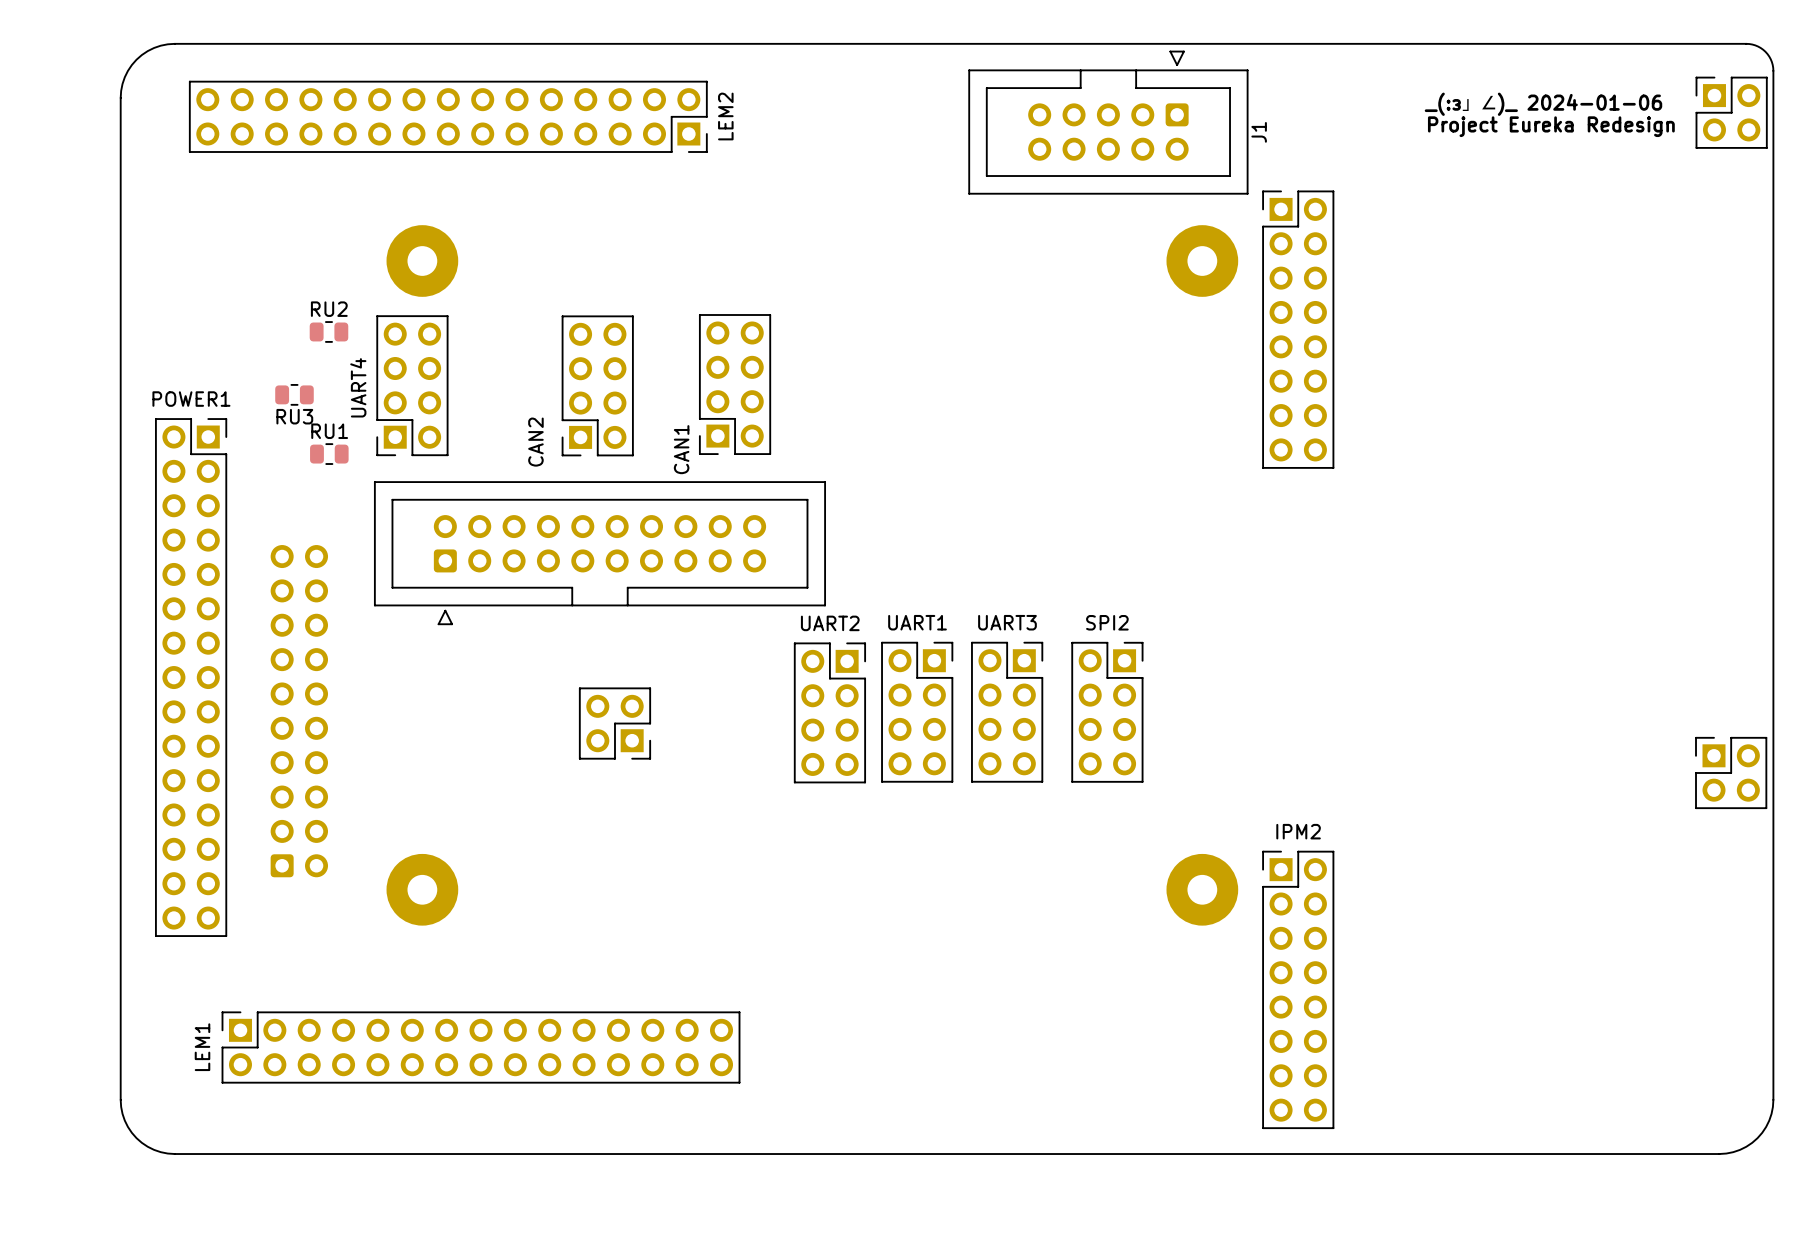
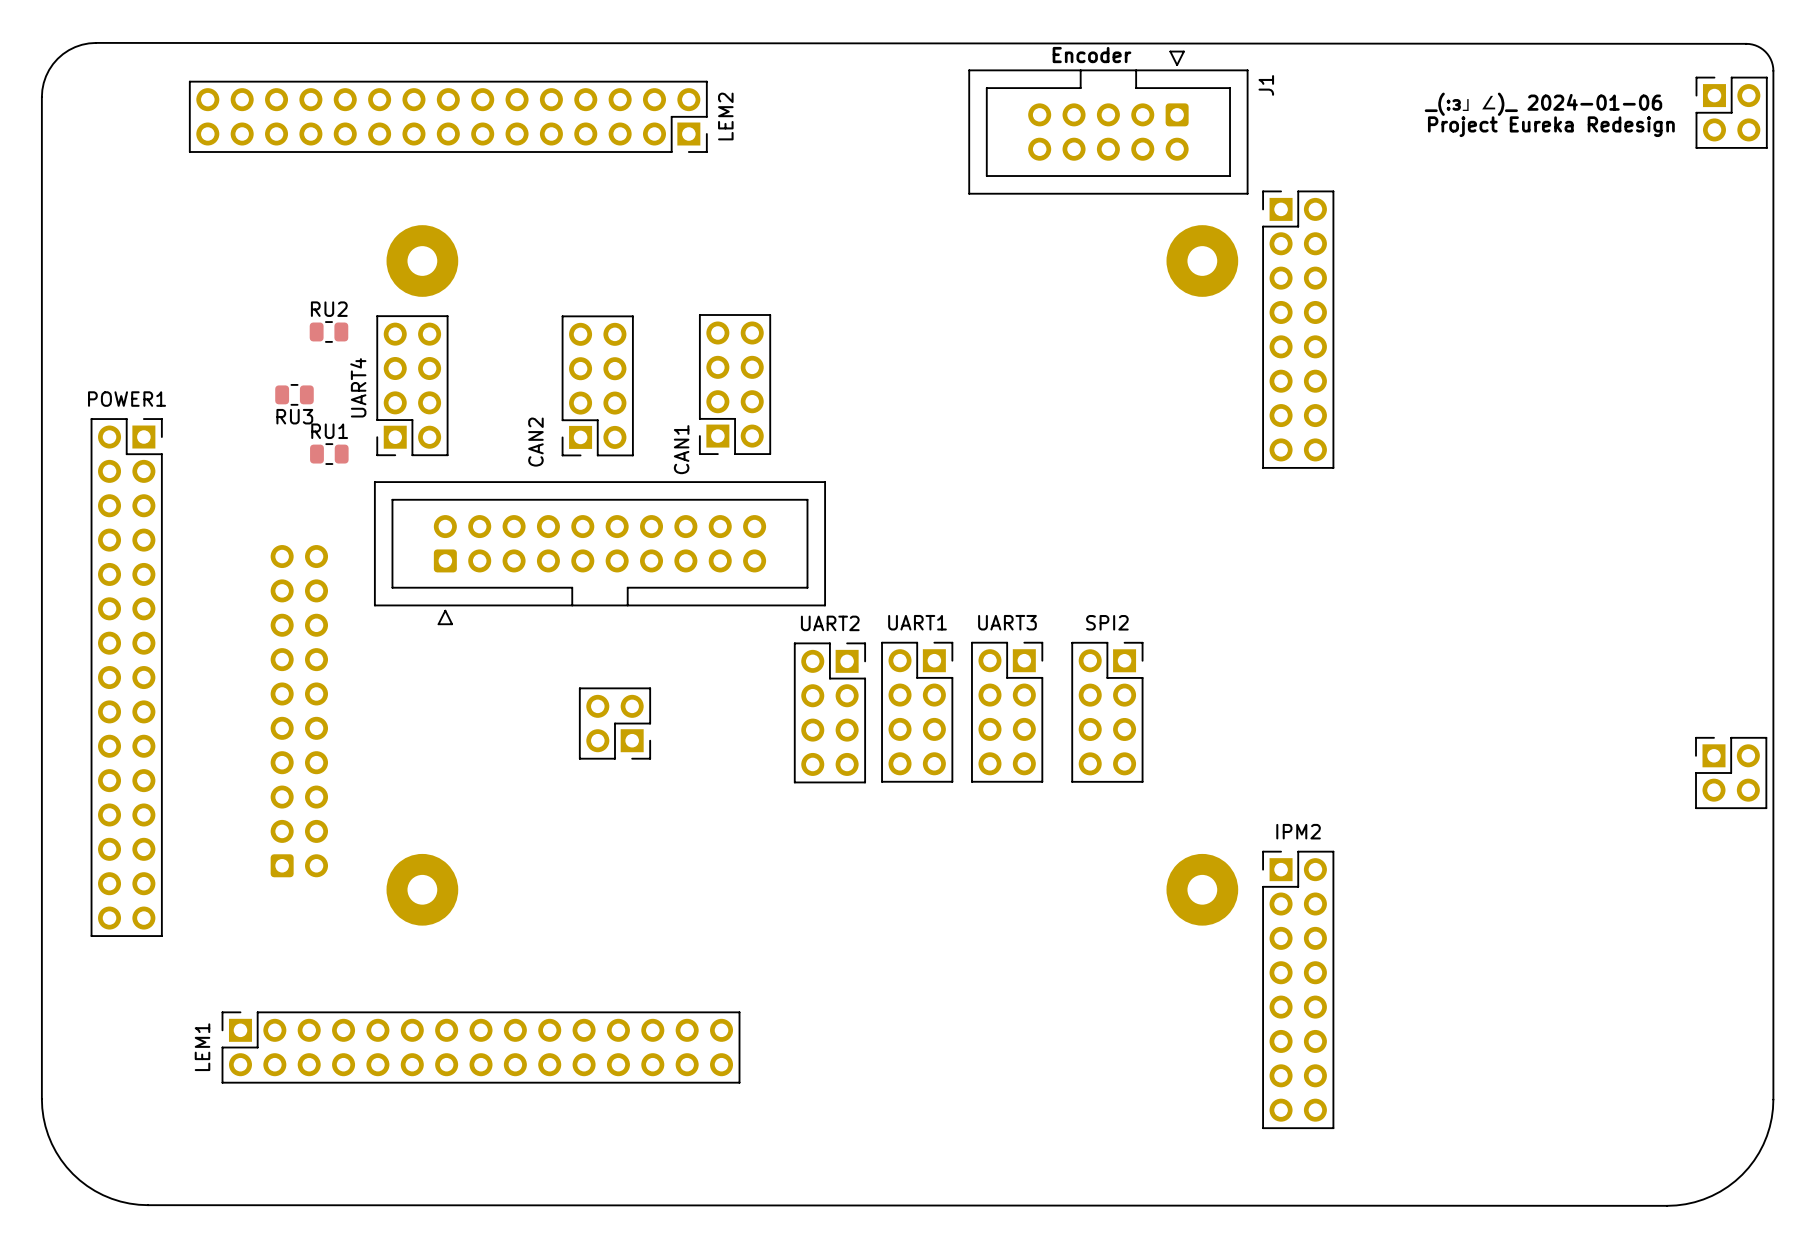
board edge: (1746, 43) (174, 43) (160, 45) (147, 51) (136, 59) (127, 70) (122, 83) (120, 97) (120, 1099) (124, 1120) (136, 1138) (154, 1149) (174, 1154) (1719, 1154) (1739, 1149) (1757, 1138) (1769, 1120) (1773, 1099) -> (1746, 43) (95, 42) (81, 44) (68, 50) (57, 58) (49, 69) (43, 83) (41, 97) (41, 1098) (43, 1117) (48, 1135) (56, 1152) (66, 1167) (79, 1180) (94, 1190) (111, 1198) (138, 1204) (1667, 1205) (1685, 1204) (1703, 1199) (1720, 1191) (1742, 1174) (1759, 1152) (1766, 1135) (1771, 1118) (1773, 1099)
text: none -> Encoder (1092, 55)
J1 name position: J1 (1259, 132) -> J1 (1266, 85)
POWER1 position: (191, 677) -> (126, 677)

